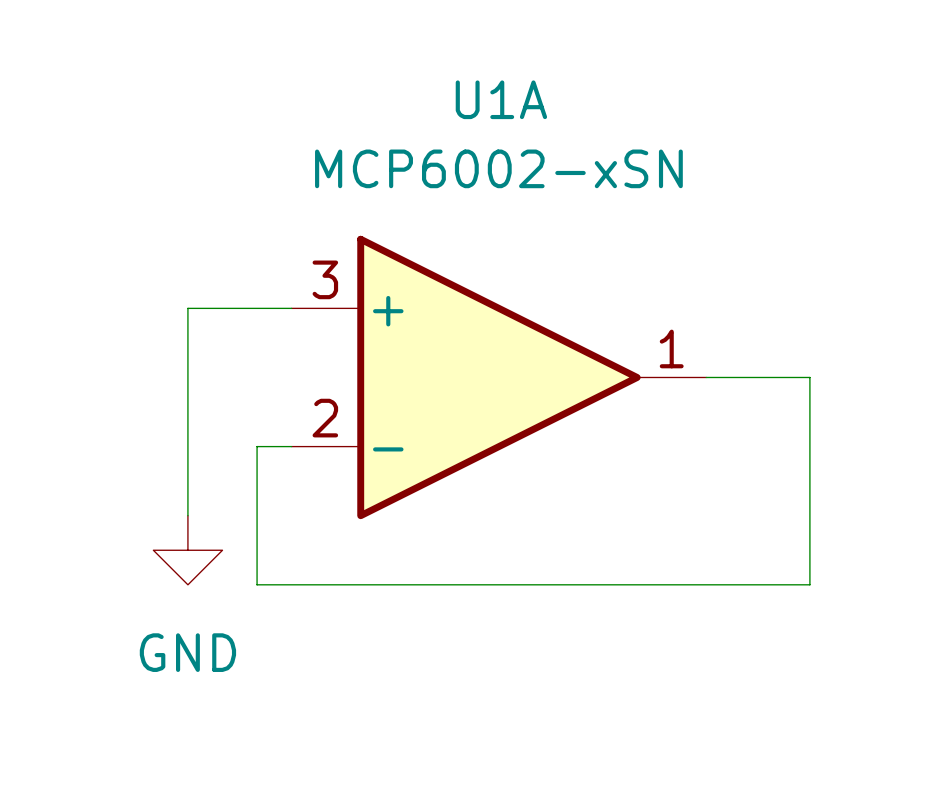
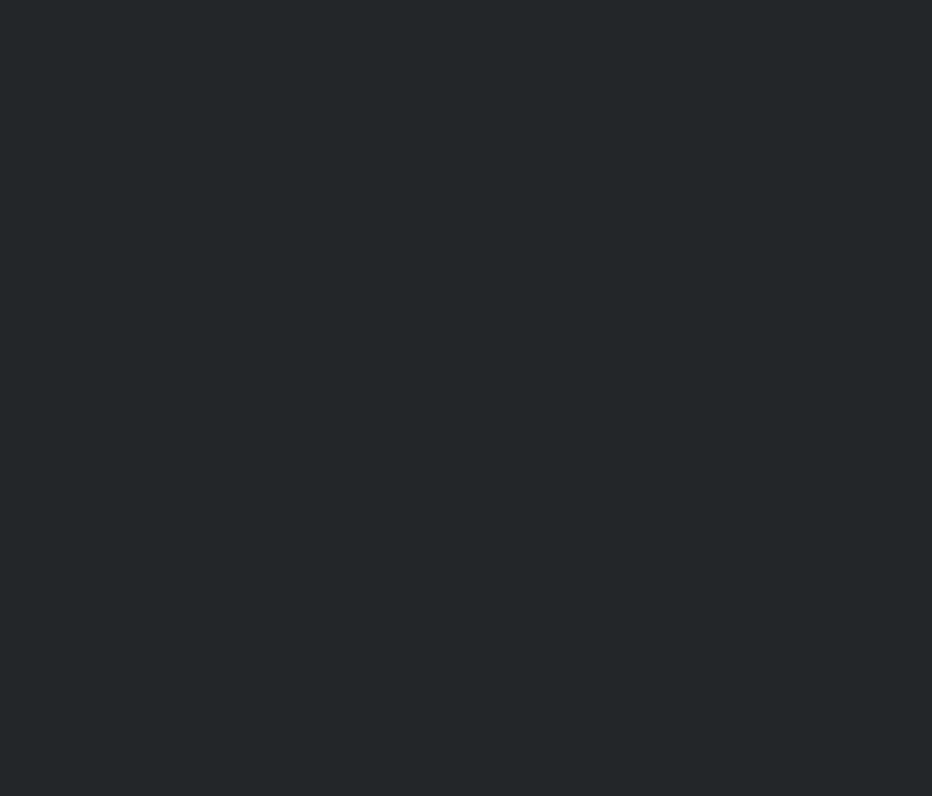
wire: (291, 308) (187, 308) (187, 515) -> none
U1A: MCP6002-xSN (498, 377) -> none
wire: (706, 377) (809, 377) (809, 584) (257, 584) (257, 446) (291, 446) -> none
power symbol: GND (187, 550) -> none

